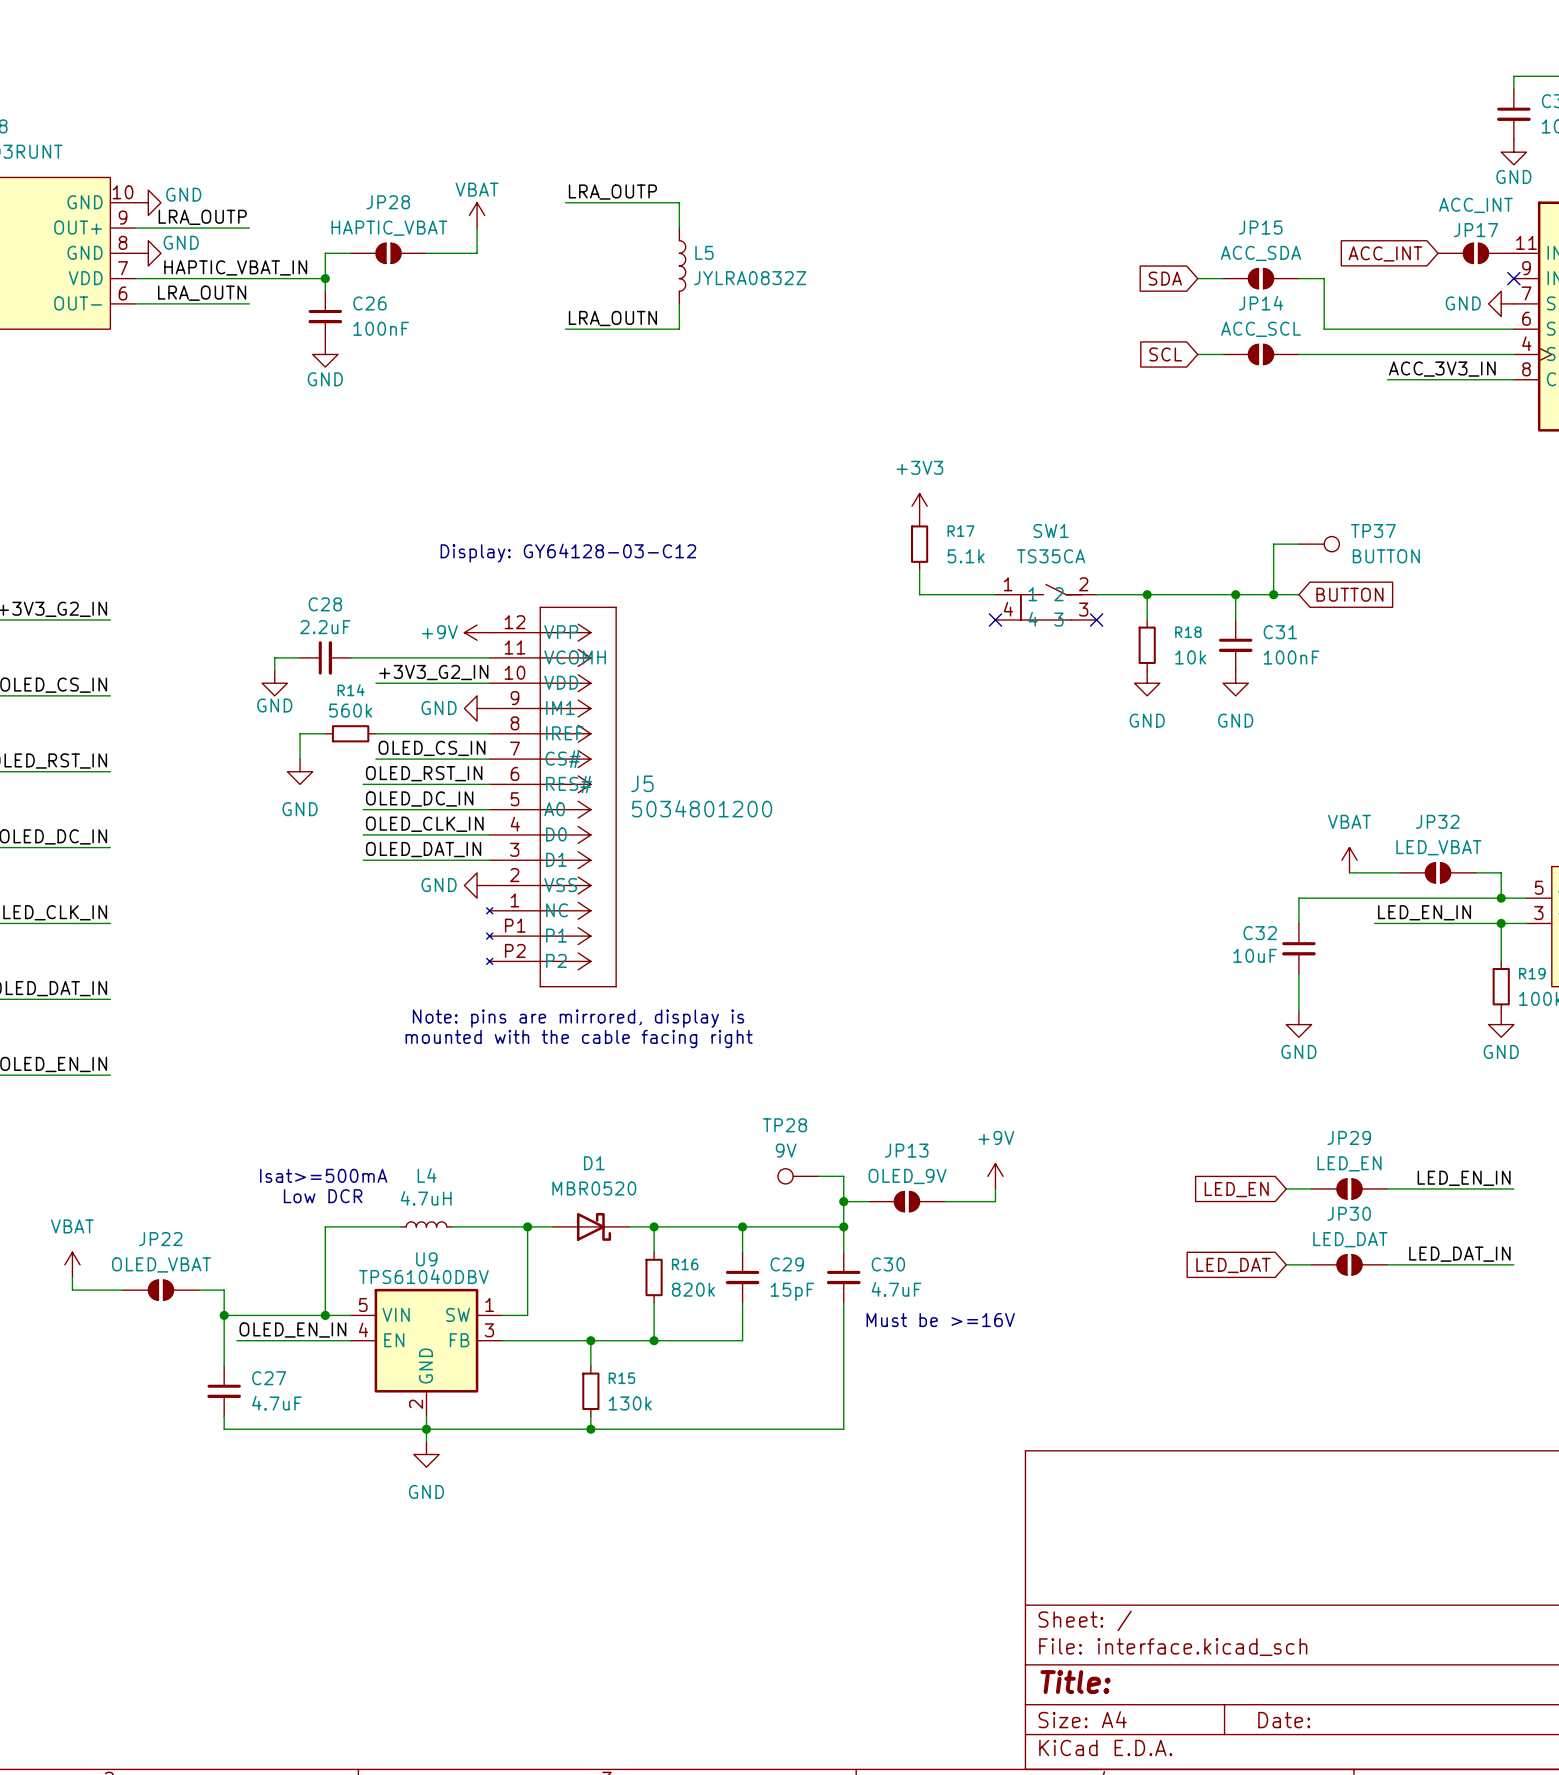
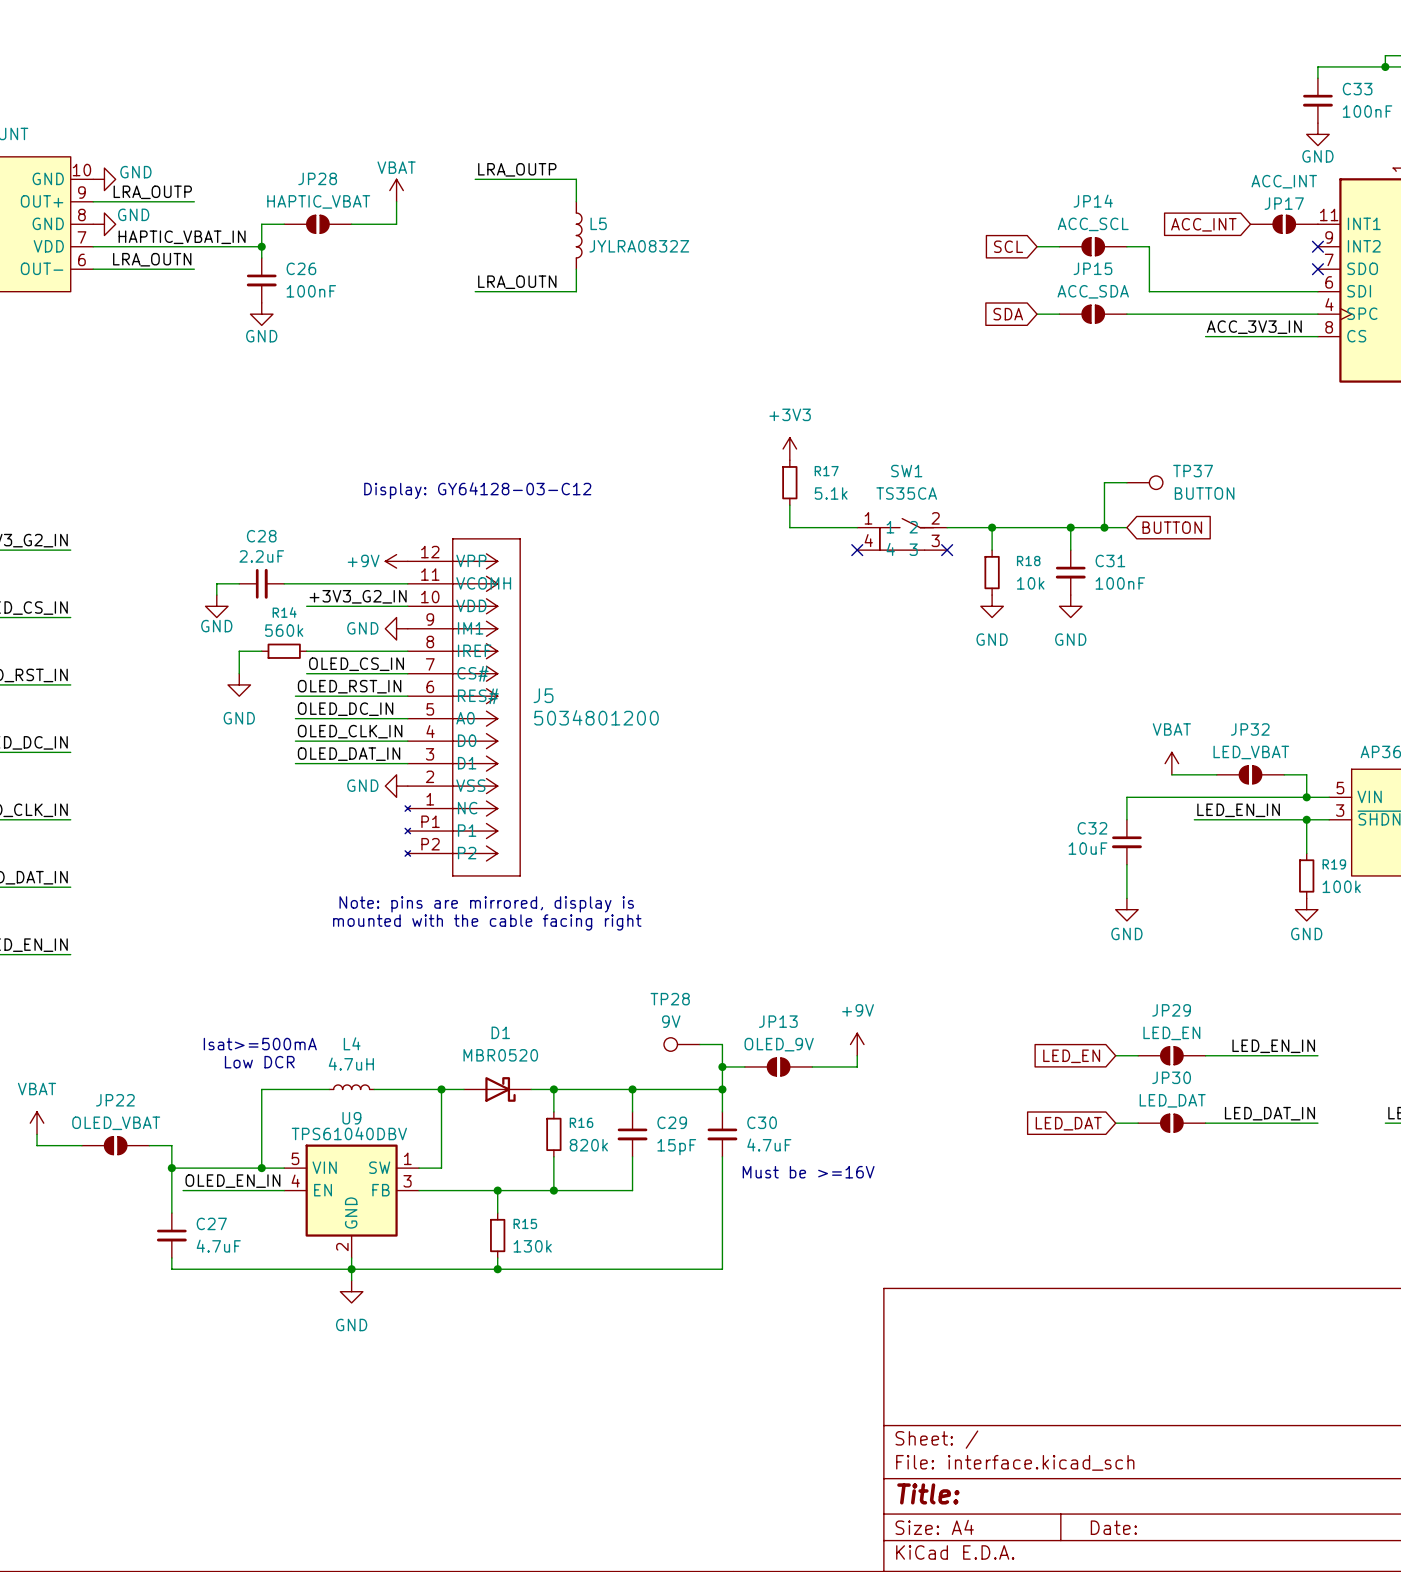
JP15 name: JP15 (1260, 227) -> JP14 (1093, 201)
JP15 value: ACC_SDA (1260, 253) -> ACC_SCL (1093, 224)
global label: SDA (1165, 278) -> SCL (1008, 246)
JP14 name: JP14 (1260, 303) -> JP15 (1092, 268)
power symbol: GND (1501, 303) -> none
no-connect mark: none -> (1317, 269)
JP14 value: ACC_SCL (1260, 329) -> ACC_SDA (1093, 291)
global label: SCL (1165, 354) -> SDA (1008, 314)

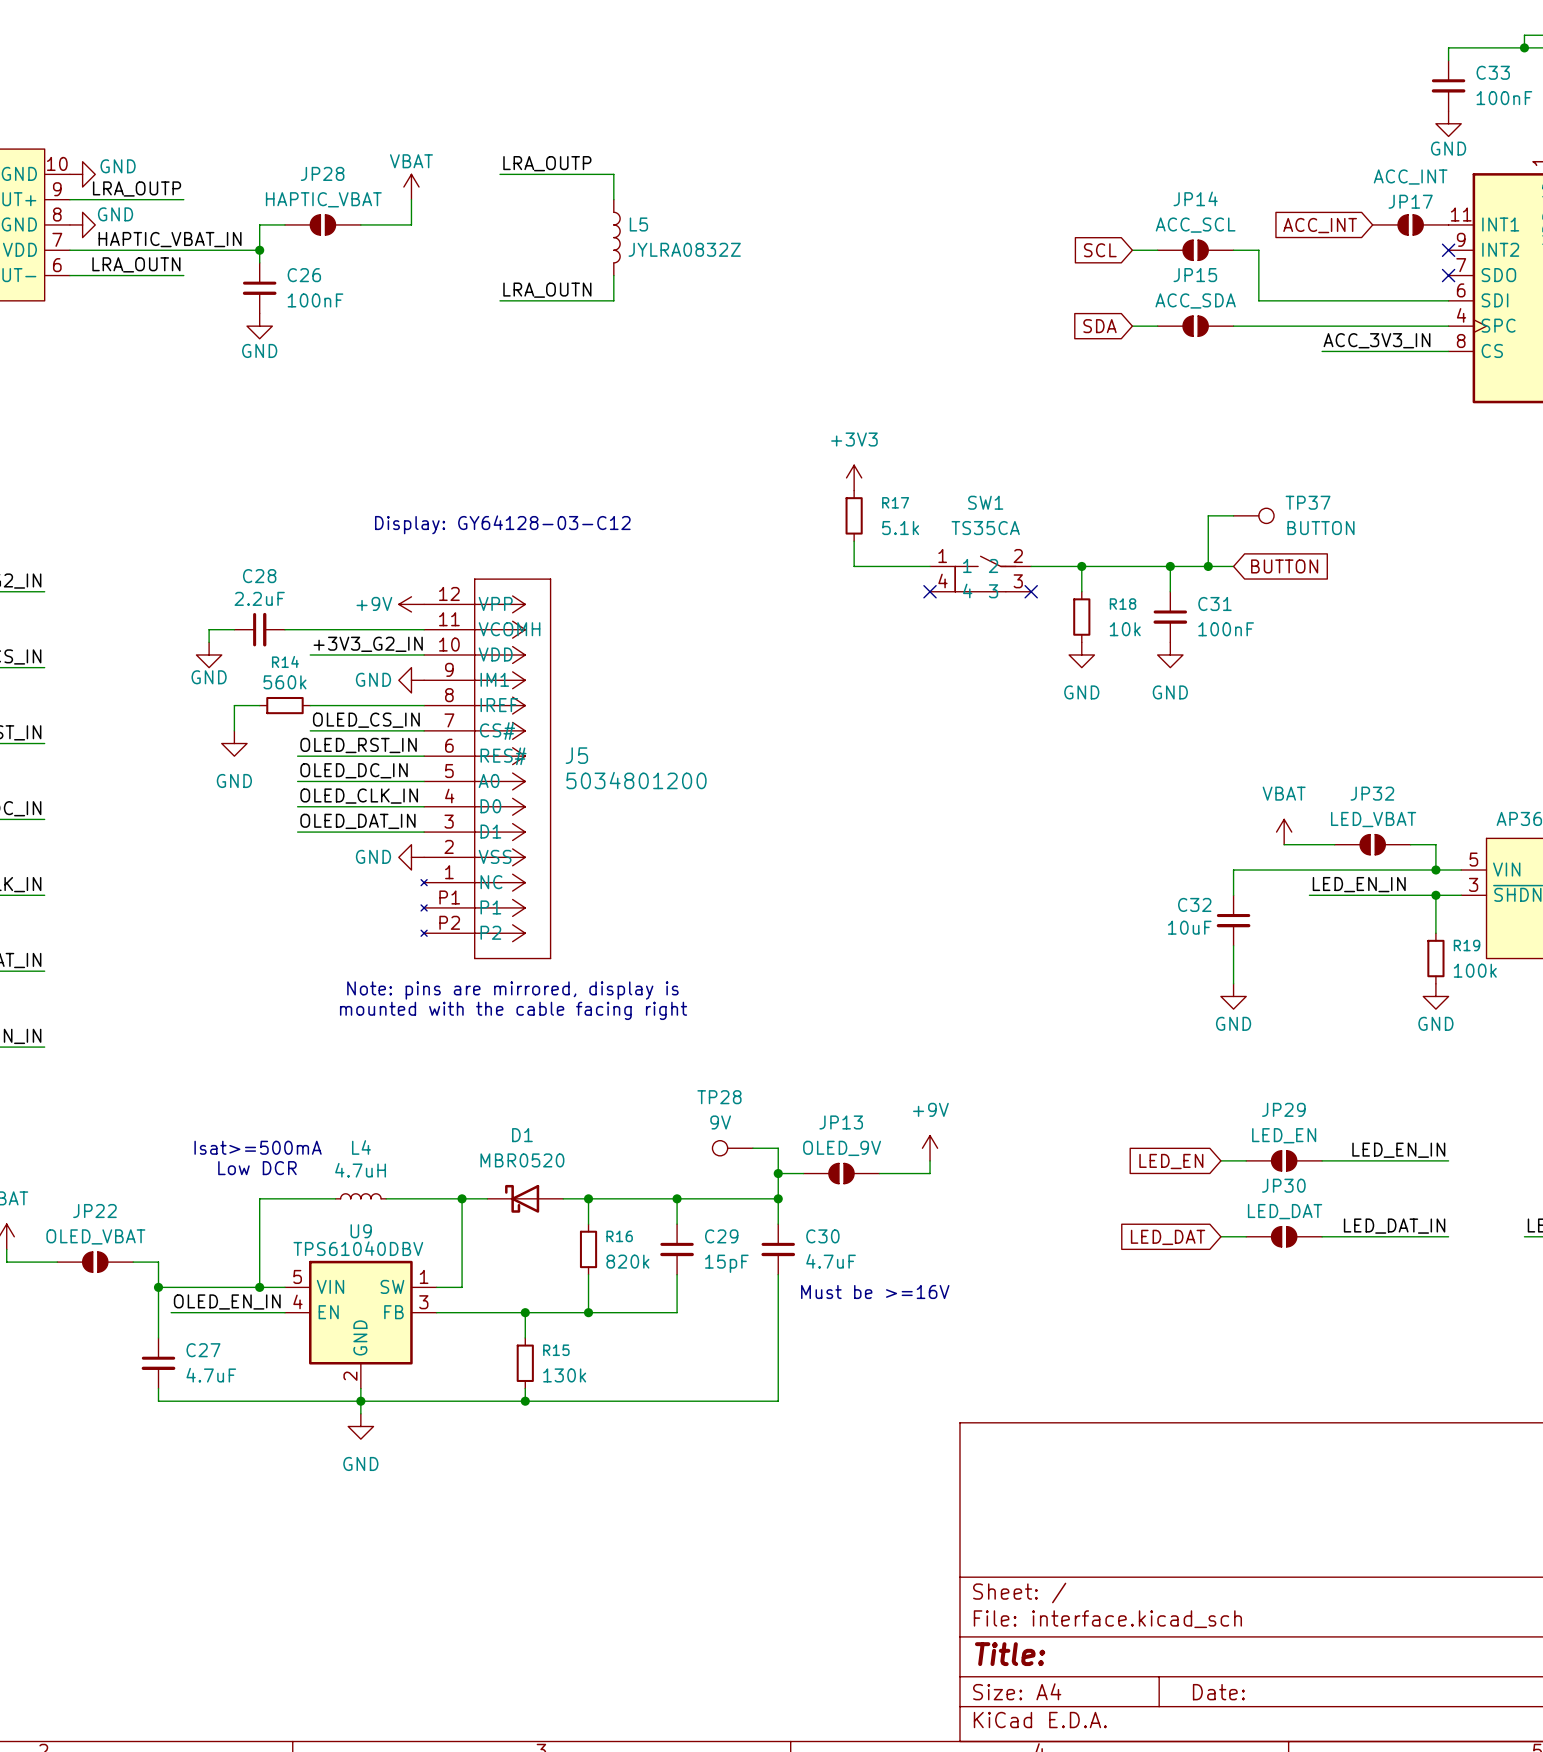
D1 rotation: 0° (500, 1089) -> 180° (522, 1198)

